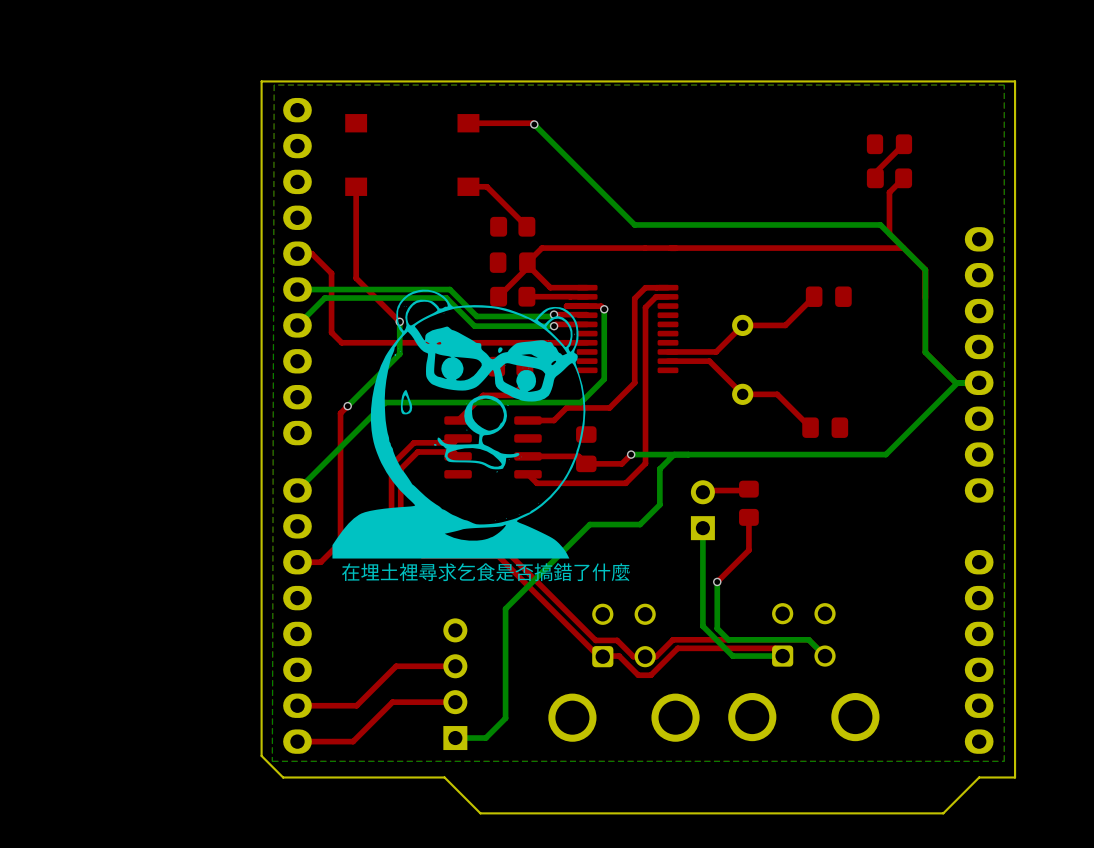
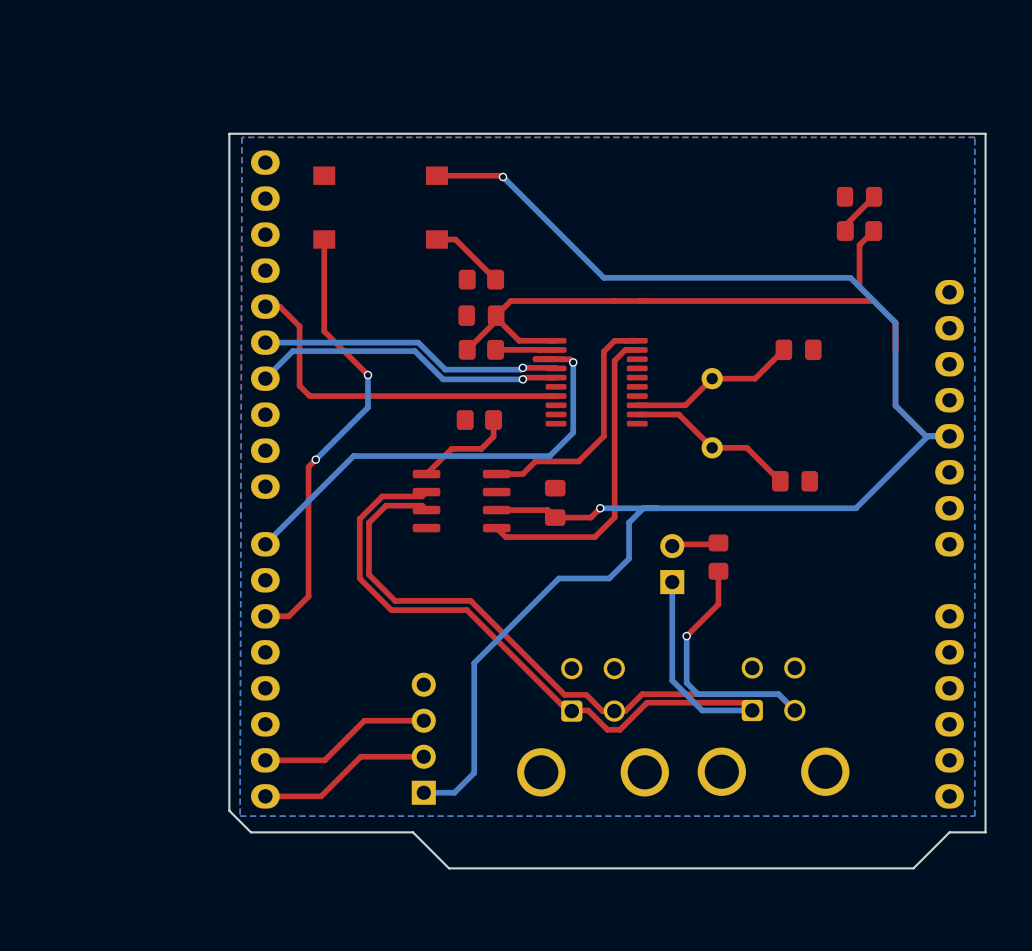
drawing: [332, 289, 586, 559] -> none
text: 在埋土裡尋求乞食是否搞錯了什麼 (485, 572) -> none

